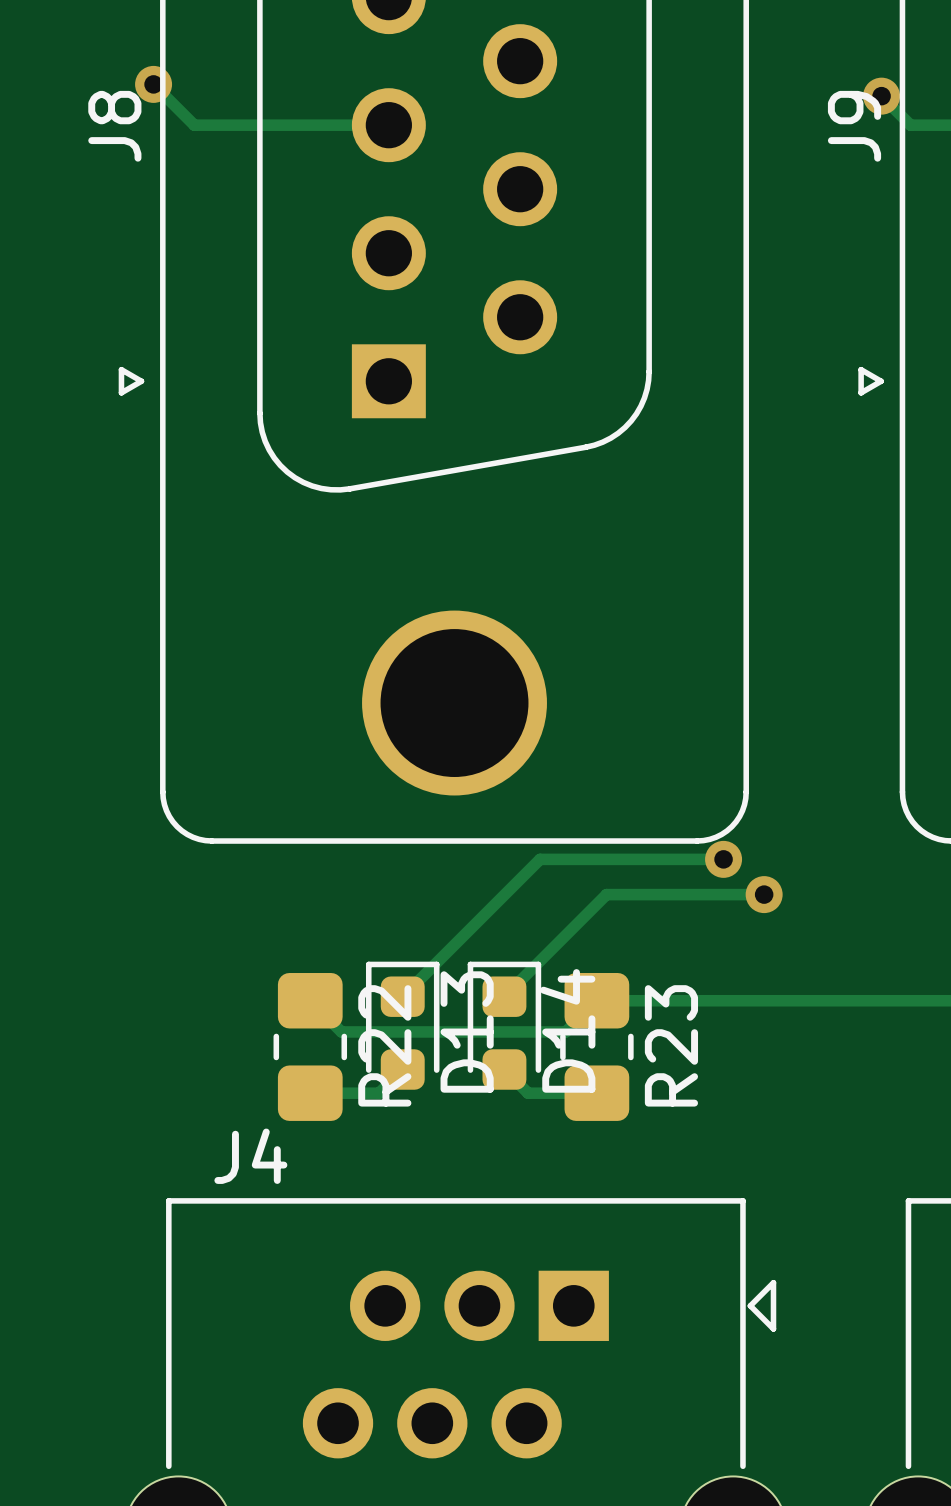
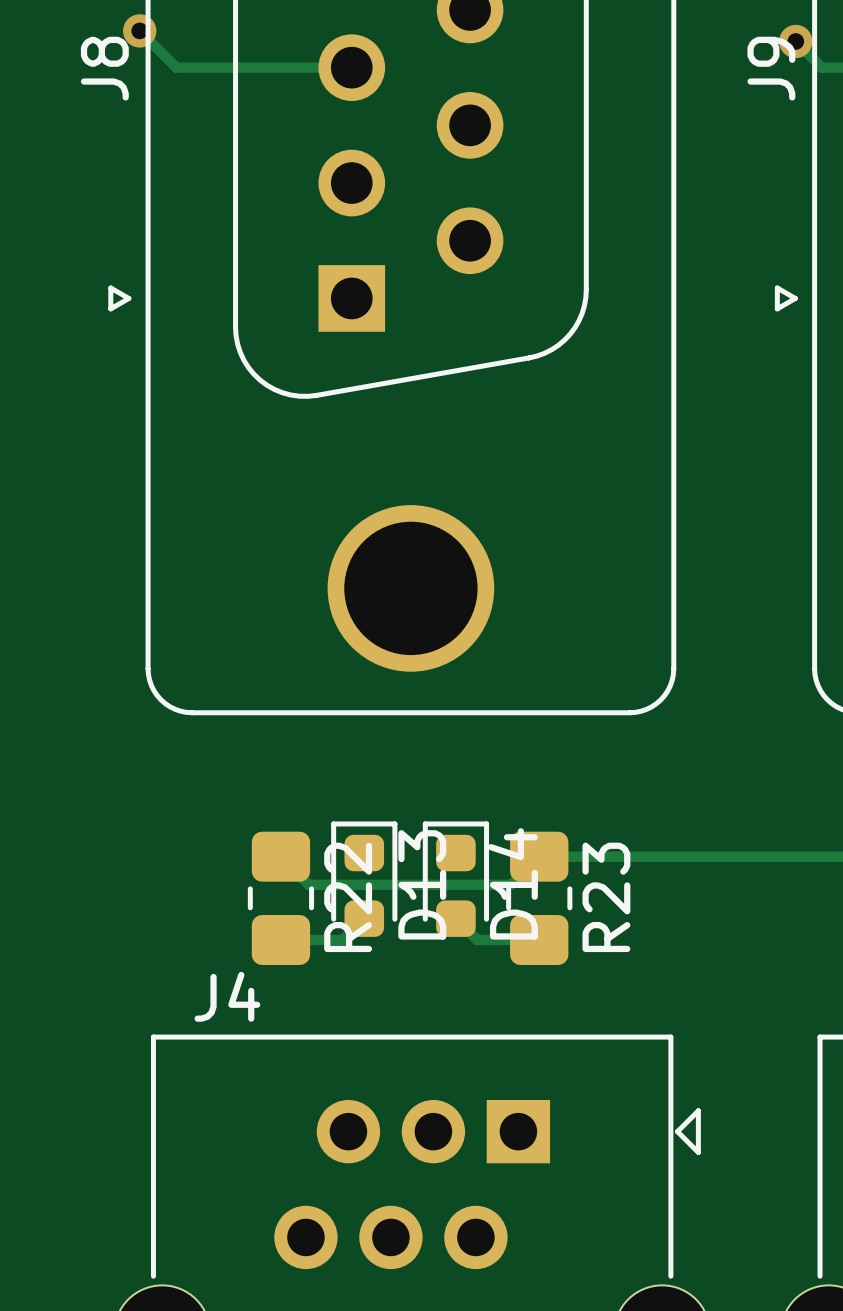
track: (723, 859) (540, 859) (402, 996) -> none
via: (723, 859) -> none
track: (764, 894) (606, 894) (504, 996) -> none
via: (764, 894) -> none

